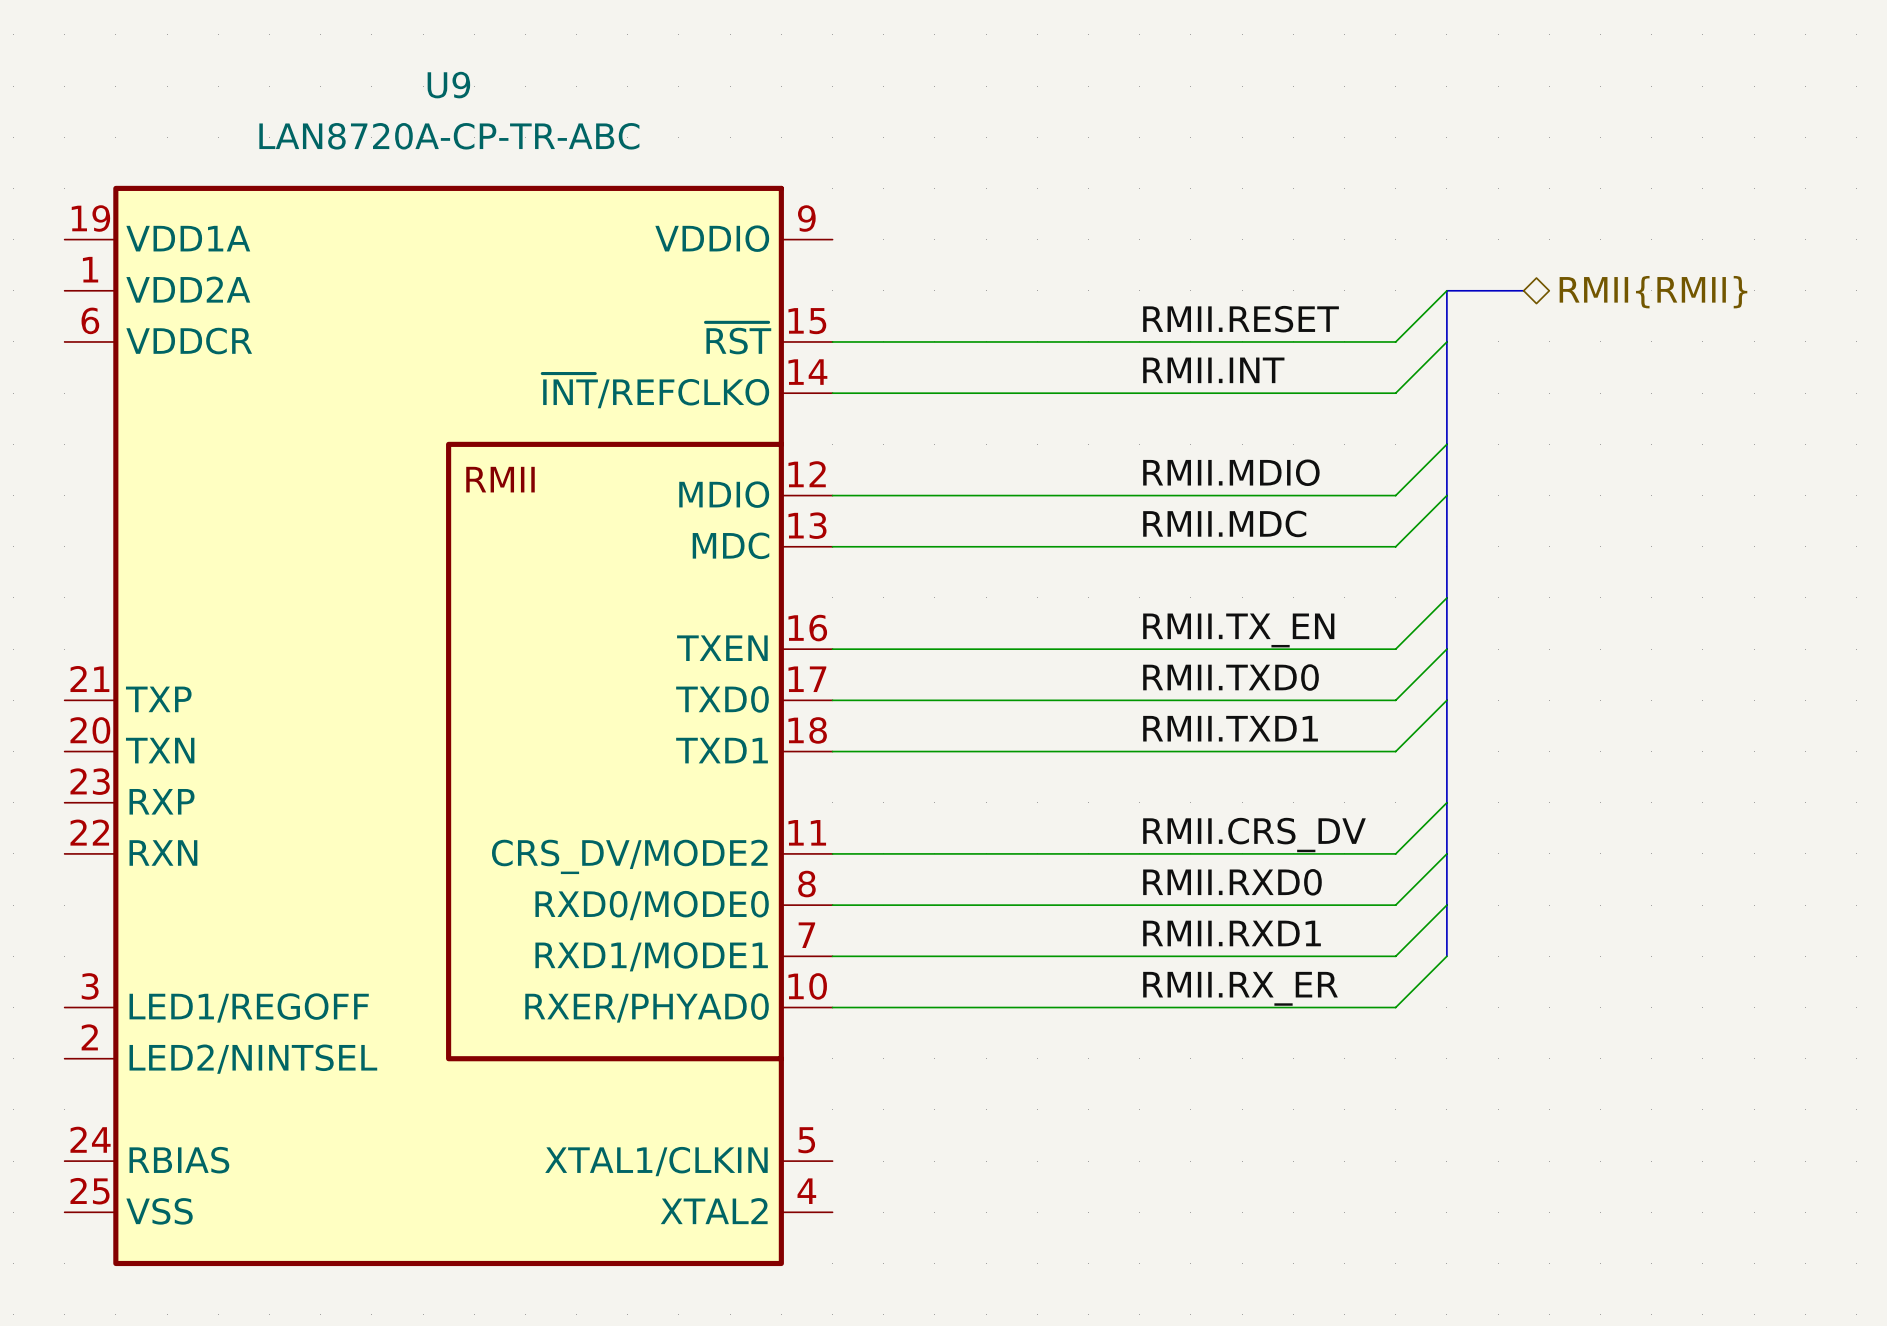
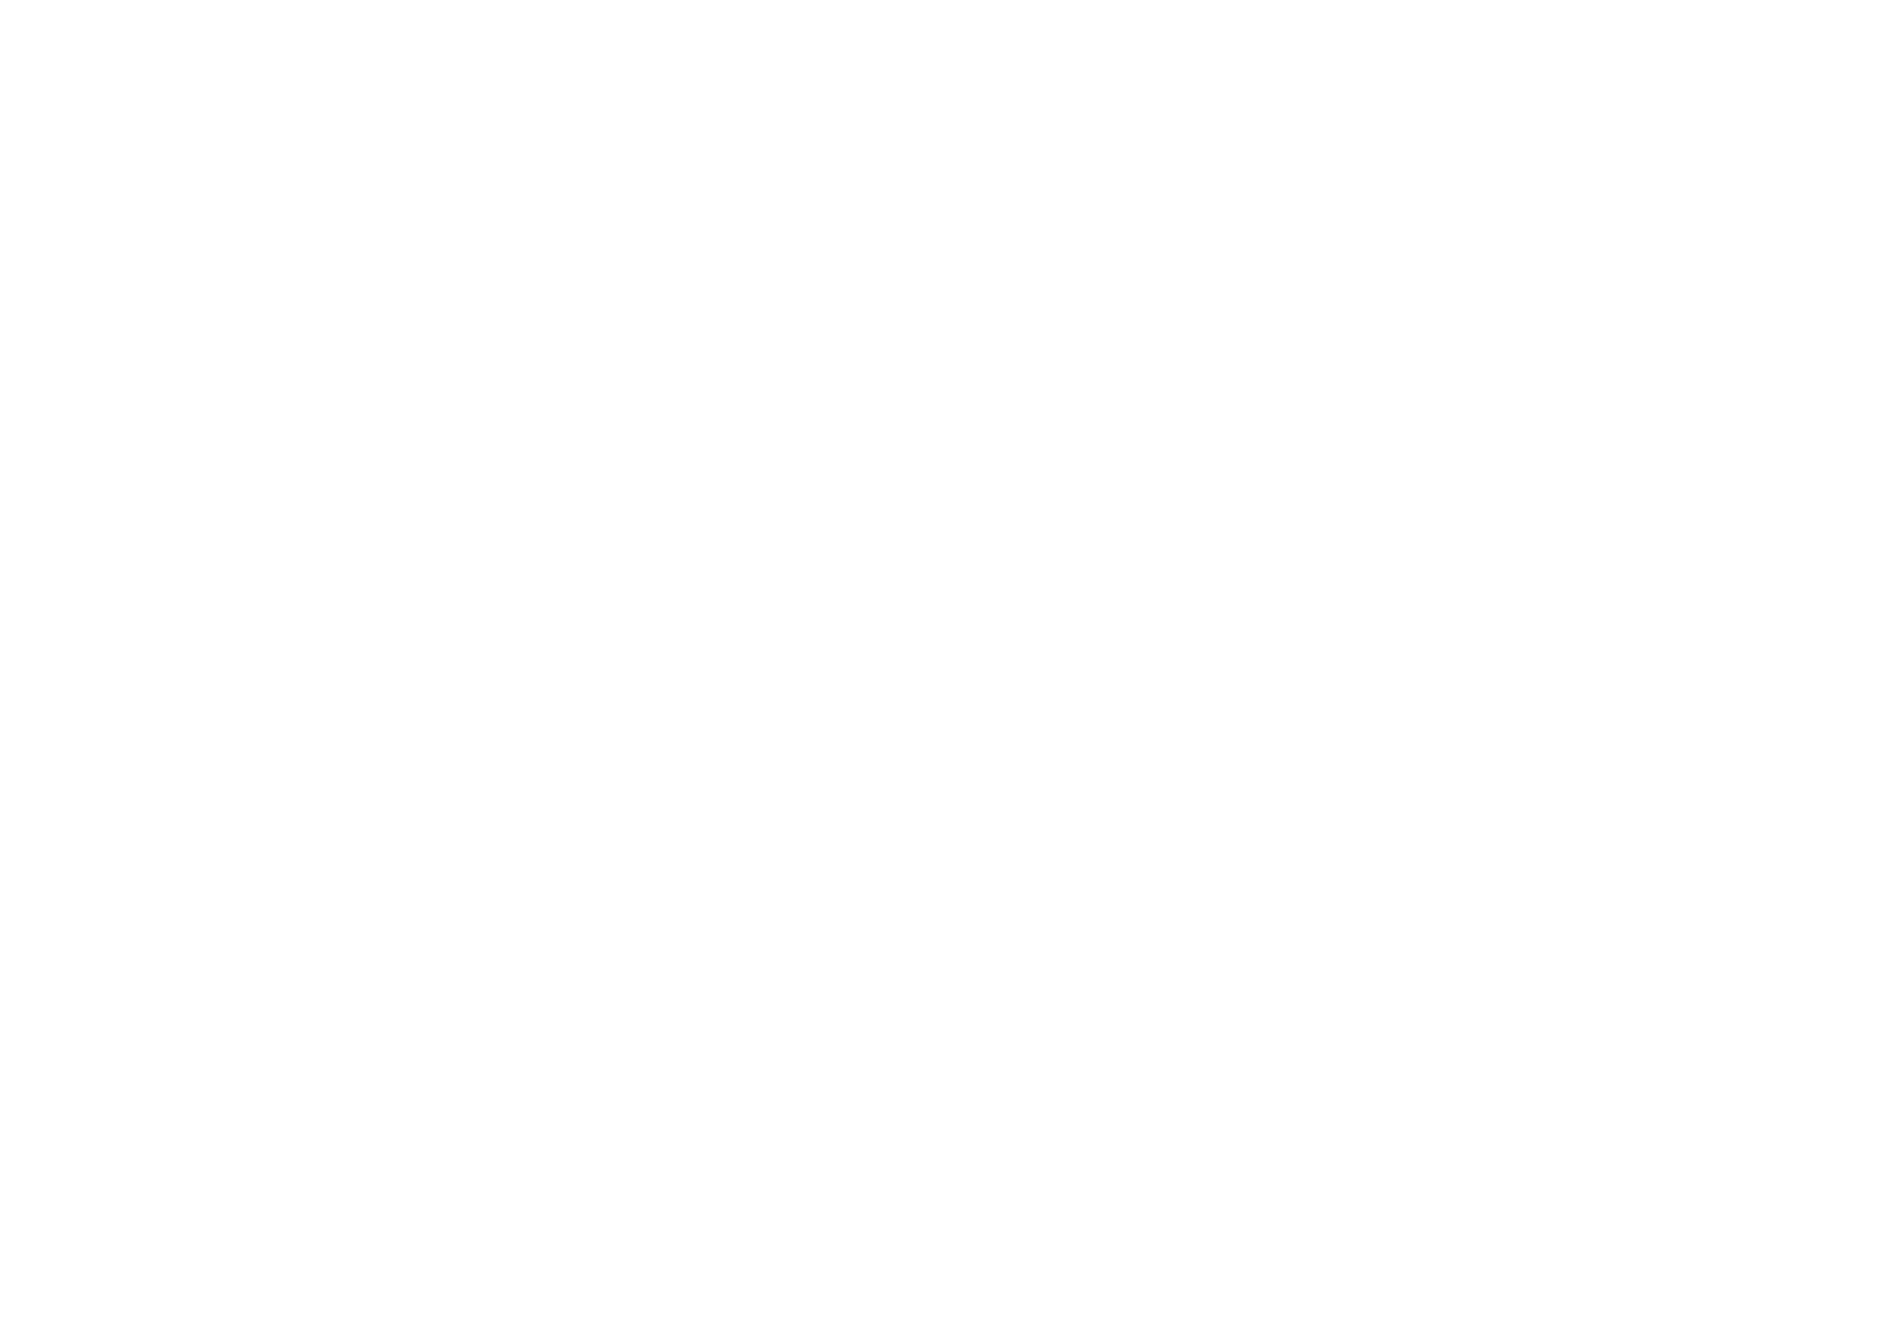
wire: (1446, 290) (1395, 341) (832, 341) -> none
bus: (1523, 290) (1446, 290) (1446, 956) -> none
hierarchical label: RMII{RMII} (1653, 292) -> none
label: RMII.RESET (1241, 319) -> none
wire: (1446, 341) (1395, 393) (832, 393) -> none
label: RMII.INT (1213, 370) -> none
wire: (1446, 444) (1395, 495) (832, 495) -> none
label: RMII.MDIO (1231, 472) -> none
wire: (1446, 495) (1395, 546) (832, 546) -> none
label: RMII.MDC (1224, 523) -> none
wire: (1446, 597) (1395, 649) (832, 649) -> none
label: RMII.TX_EN (1238, 630) -> none
wire: (1446, 649) (1395, 700) (832, 700) -> none
label: RMII.TXD0 (1231, 677) -> none
wire: (1446, 700) (1395, 751) (832, 751) -> none
U9: (448, 725) -> none
label: RMII.TXD1 (1230, 728) -> none
wire: (1446, 802) (1395, 853) (832, 853) -> none
label: RMII.CRS_DV (1254, 835) -> none
wire: (1446, 853) (1395, 905) (832, 905) -> none
label: RMII.RXD0 (1232, 882) -> none
wire: (1446, 905) (1395, 956) (832, 956) -> none
label: RMII.RXD1 (1232, 933) -> none
wire: (1446, 956) (1395, 1007) (832, 1007) -> none
label: RMII.RX_ER (1240, 988) -> none

